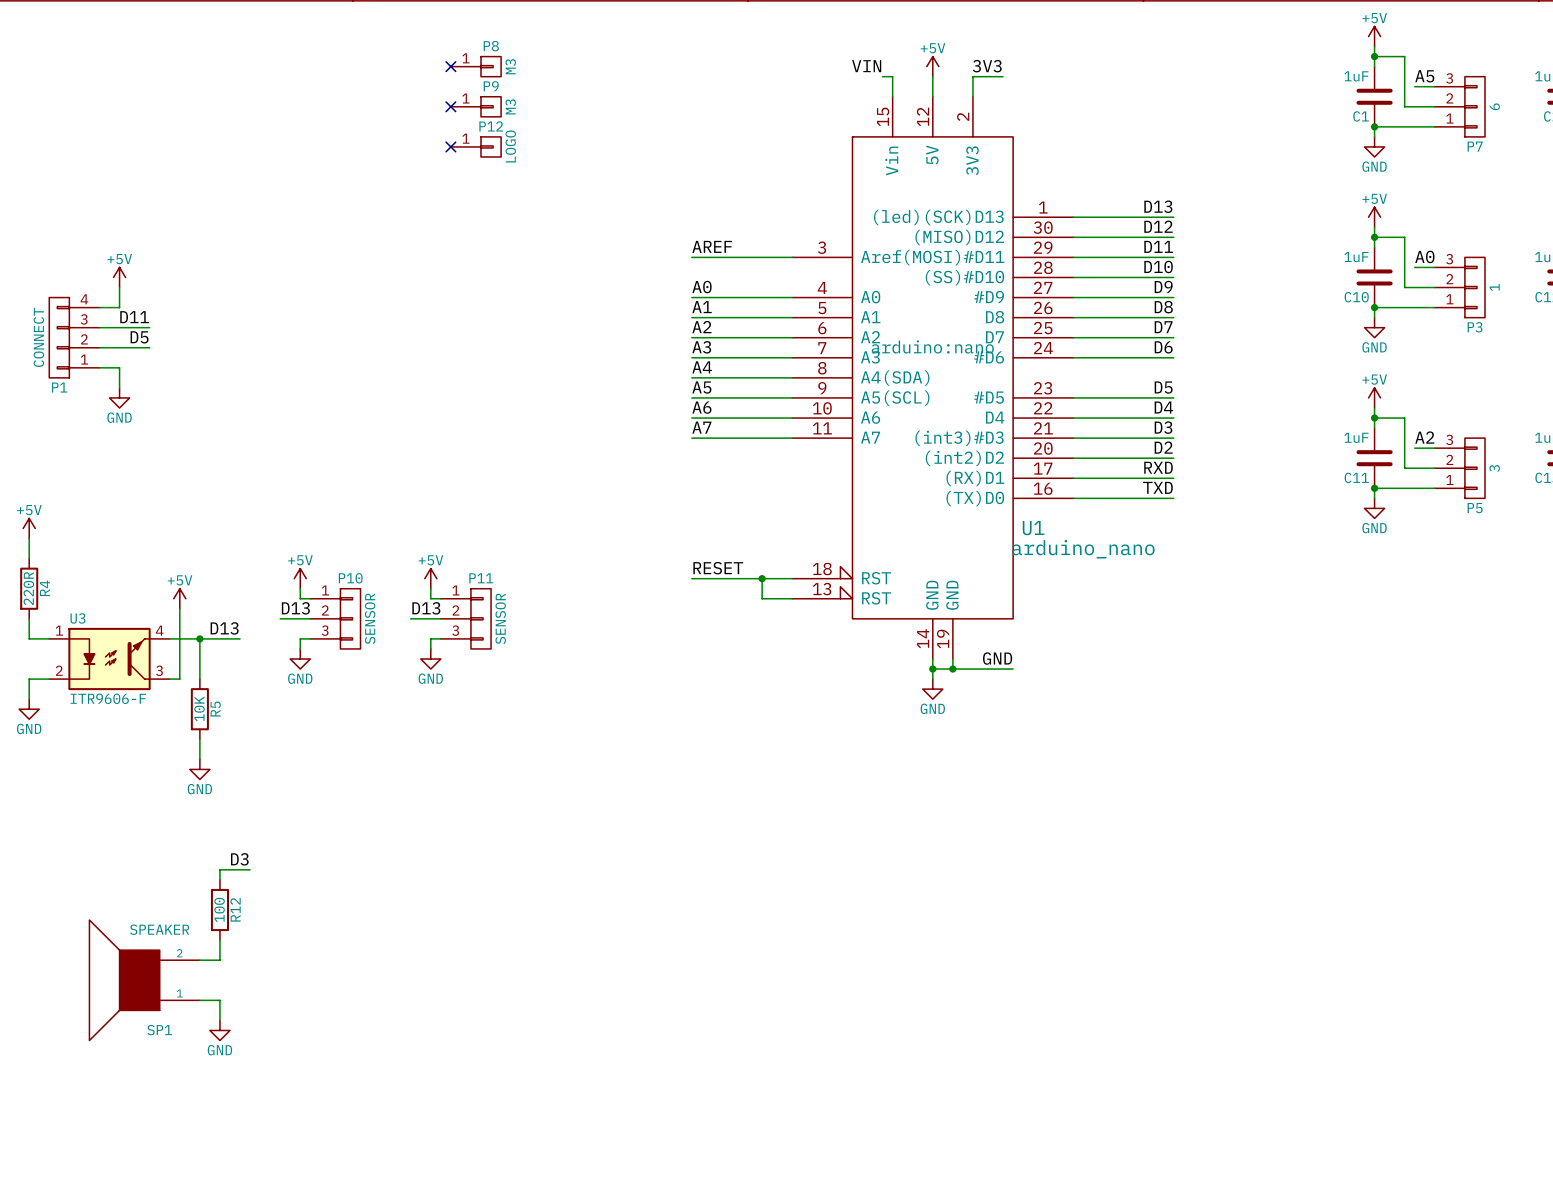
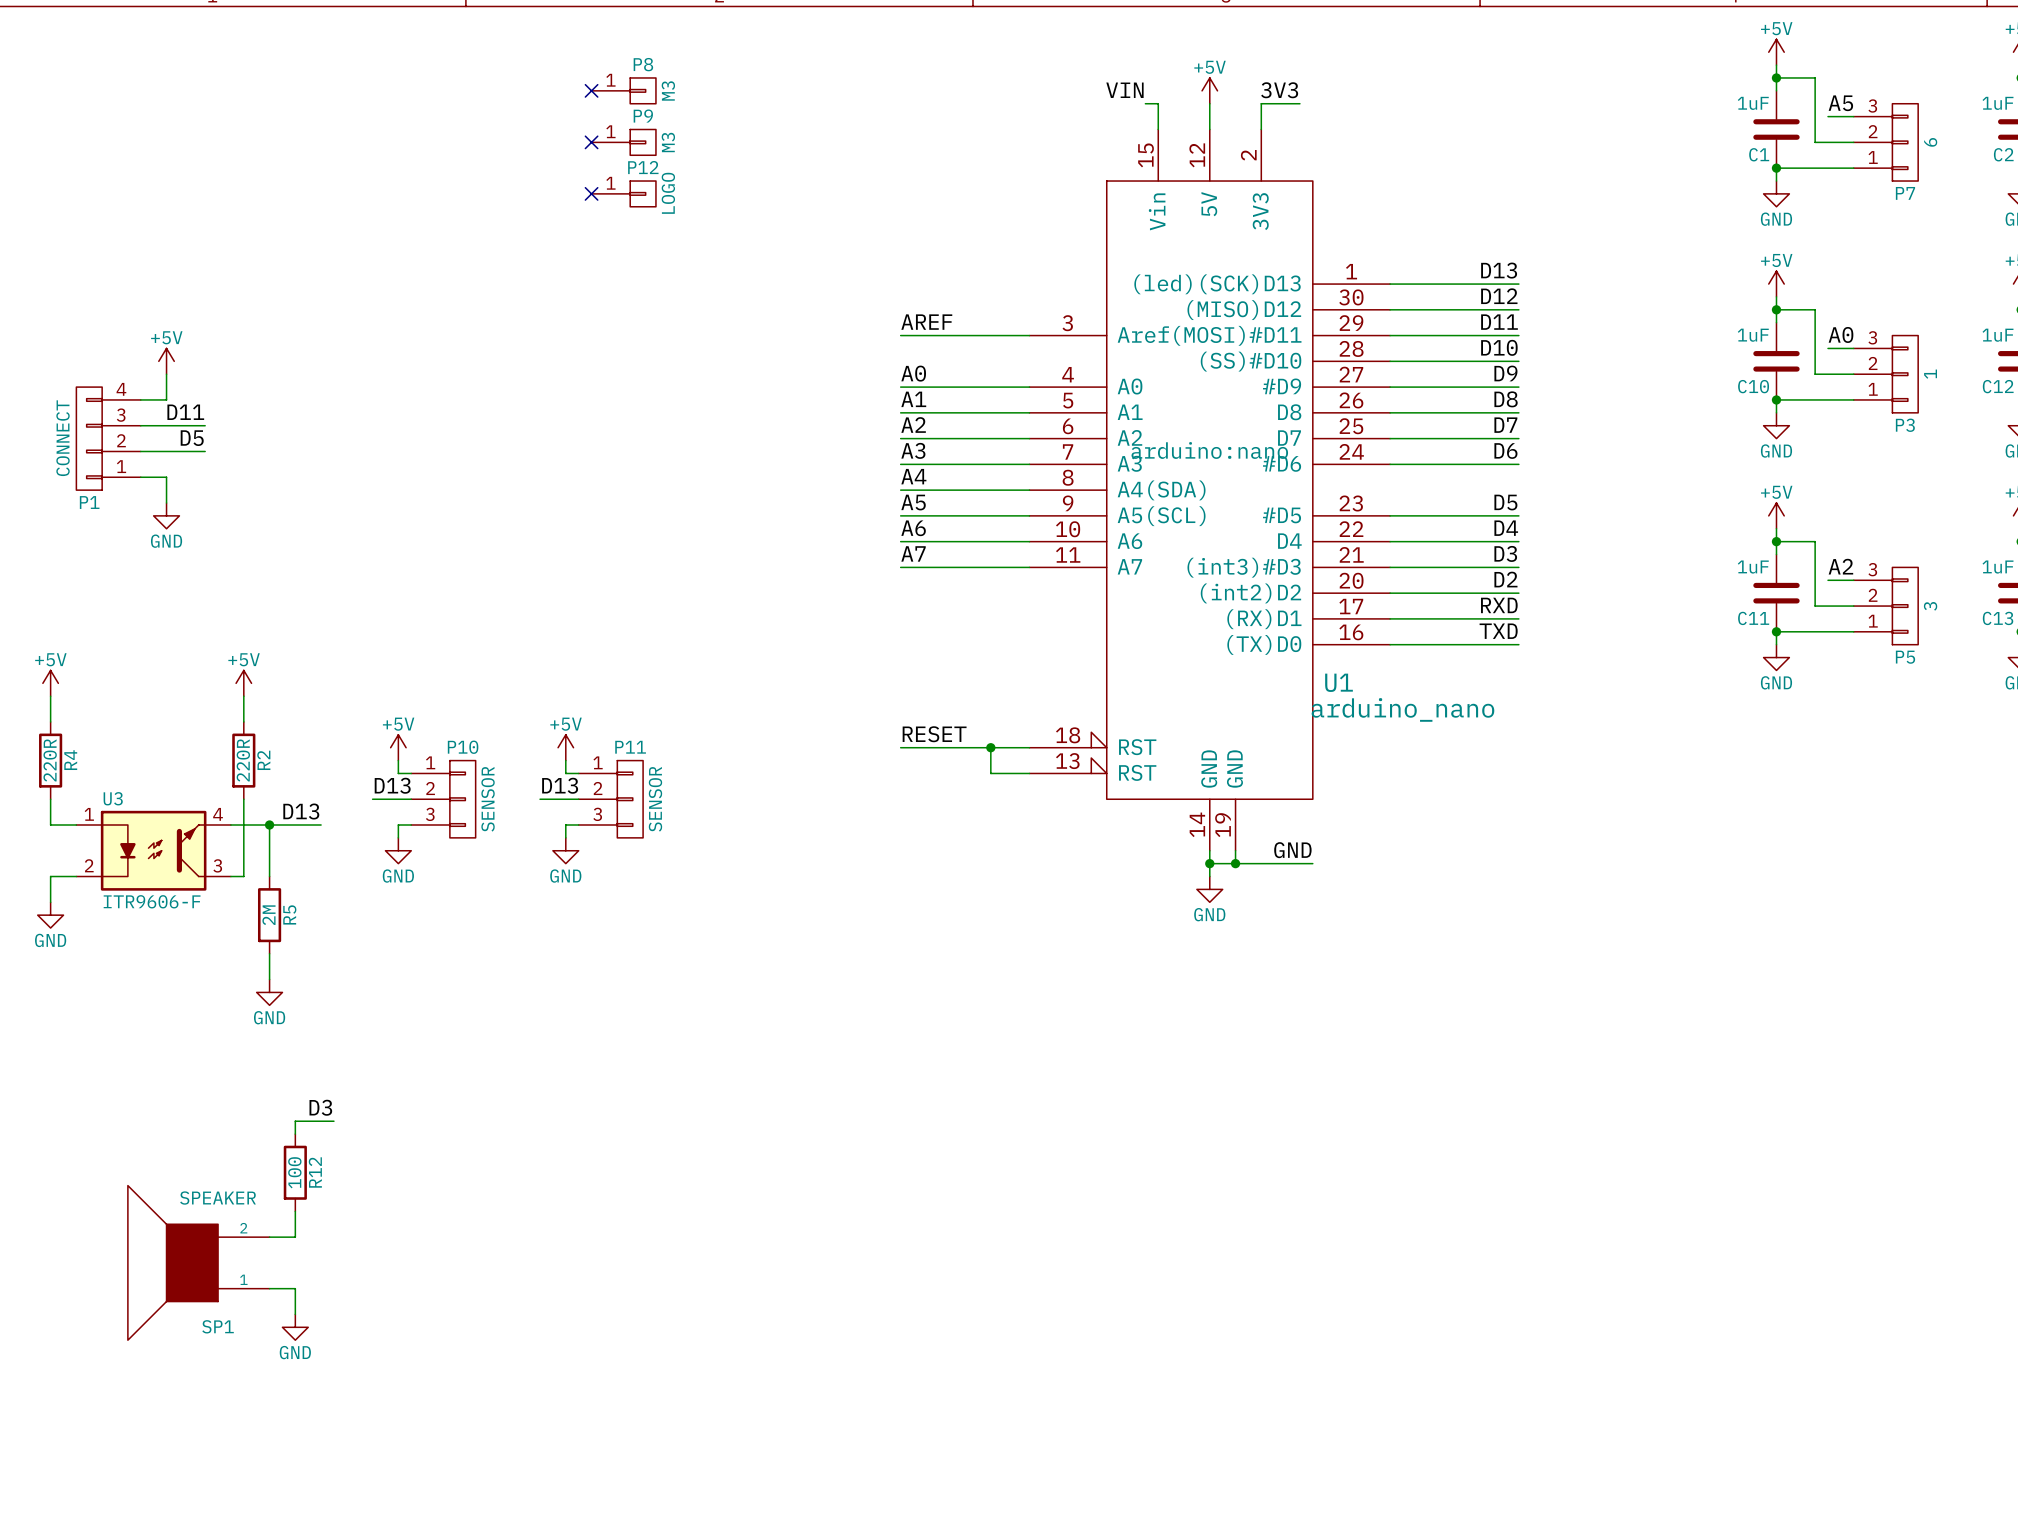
wire: none -> (243, 696) (243, 721)
R2: none -> 220R (243, 760)
power symbol position: +5V (179, 598) -> +5V (243, 683)
R5 value: 10K (199, 708) -> 2M (268, 915)

